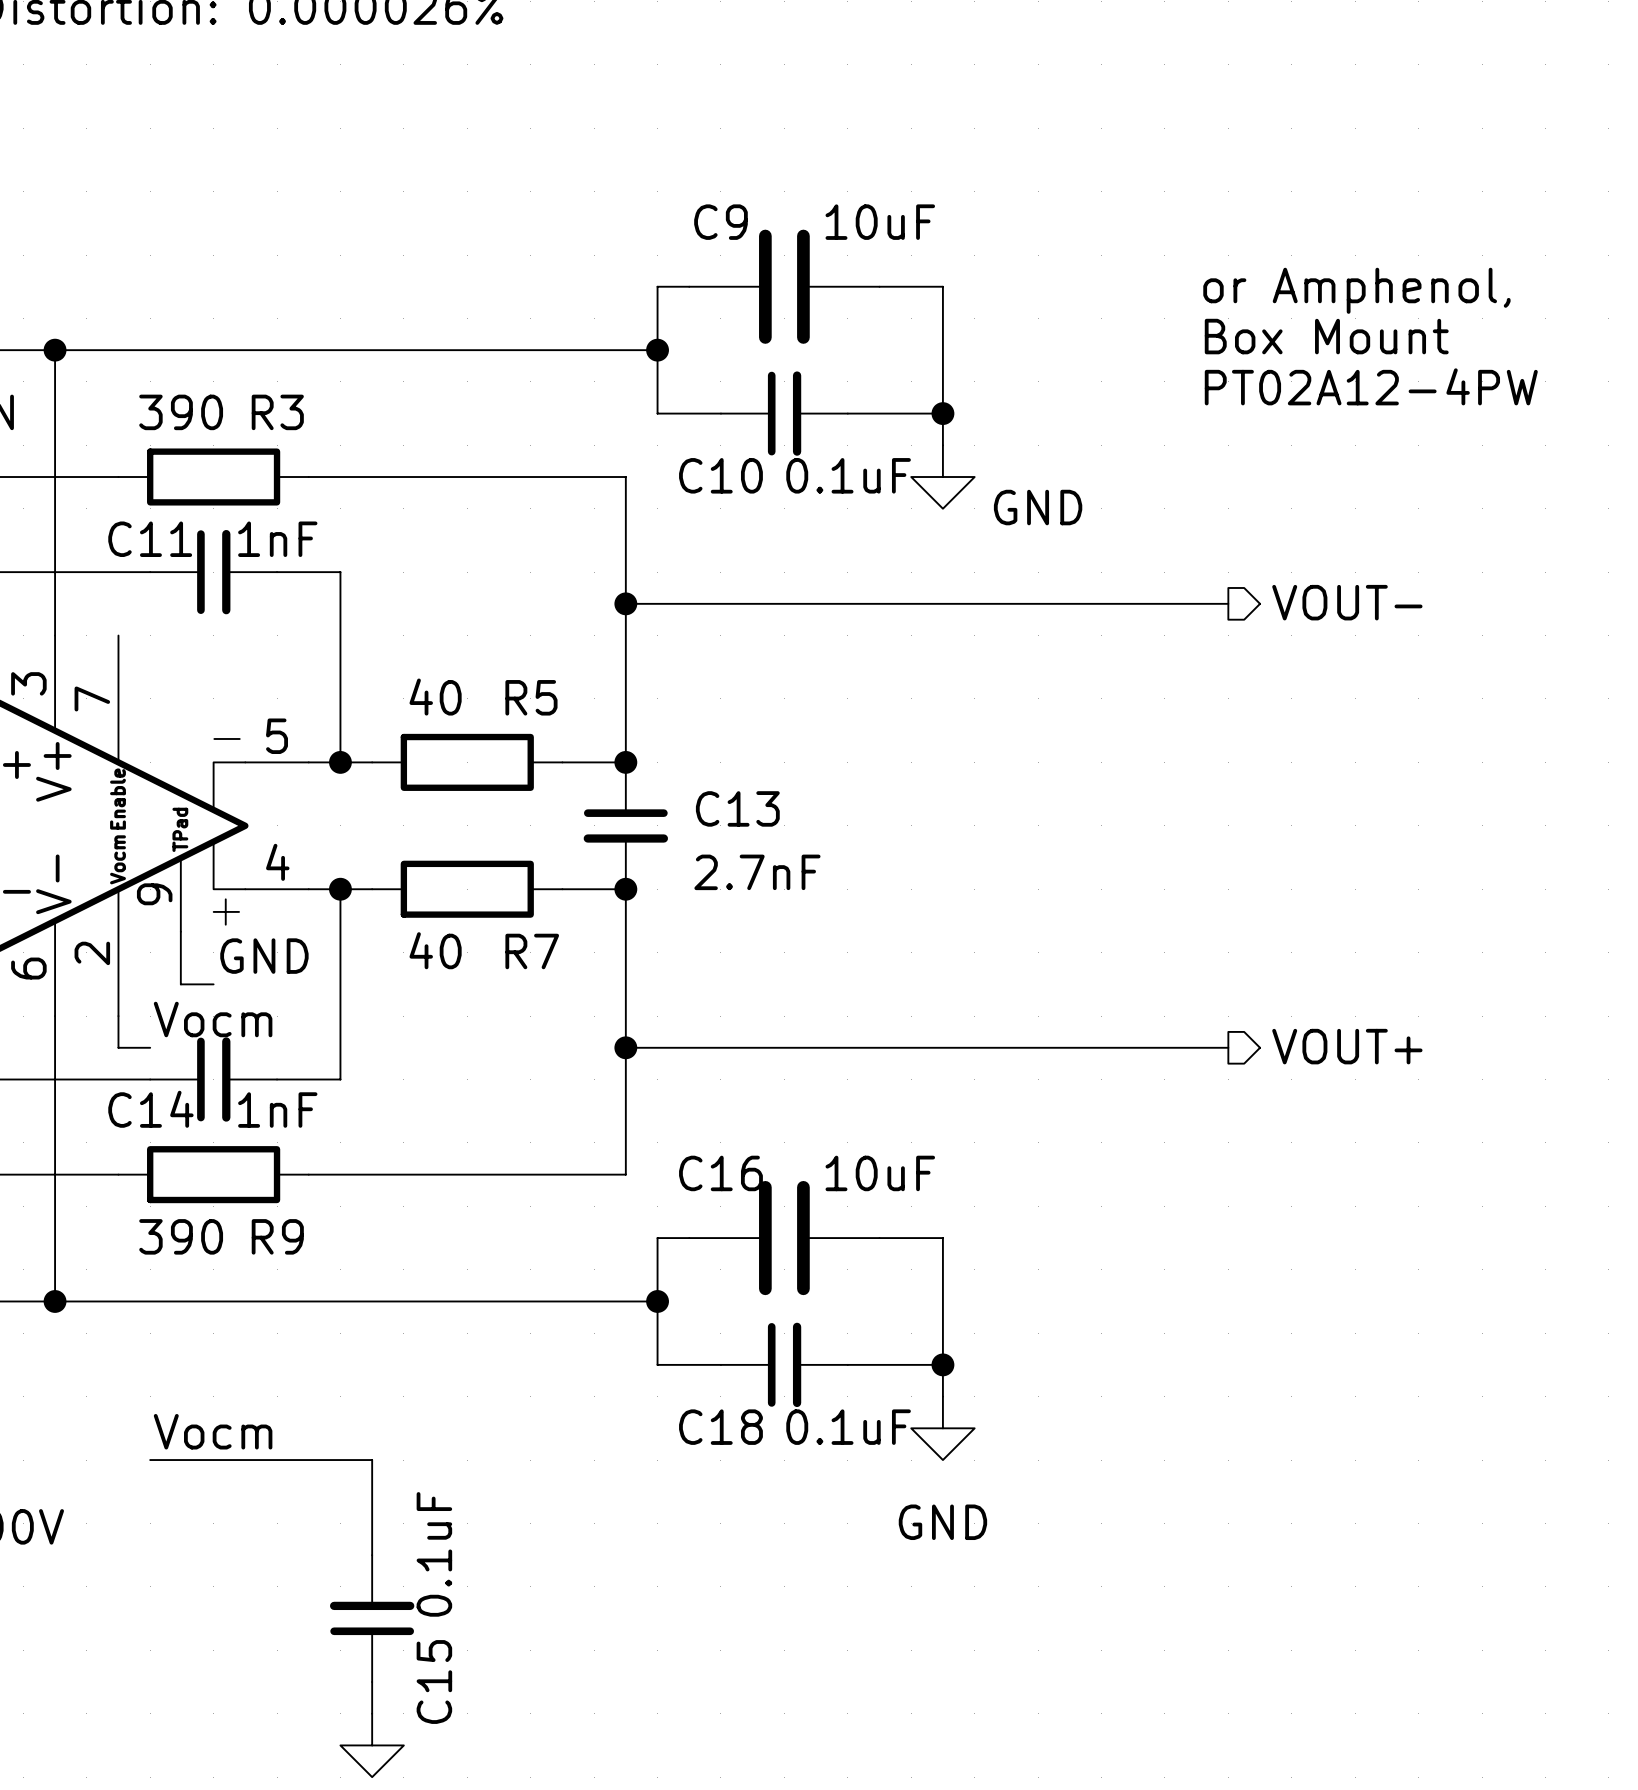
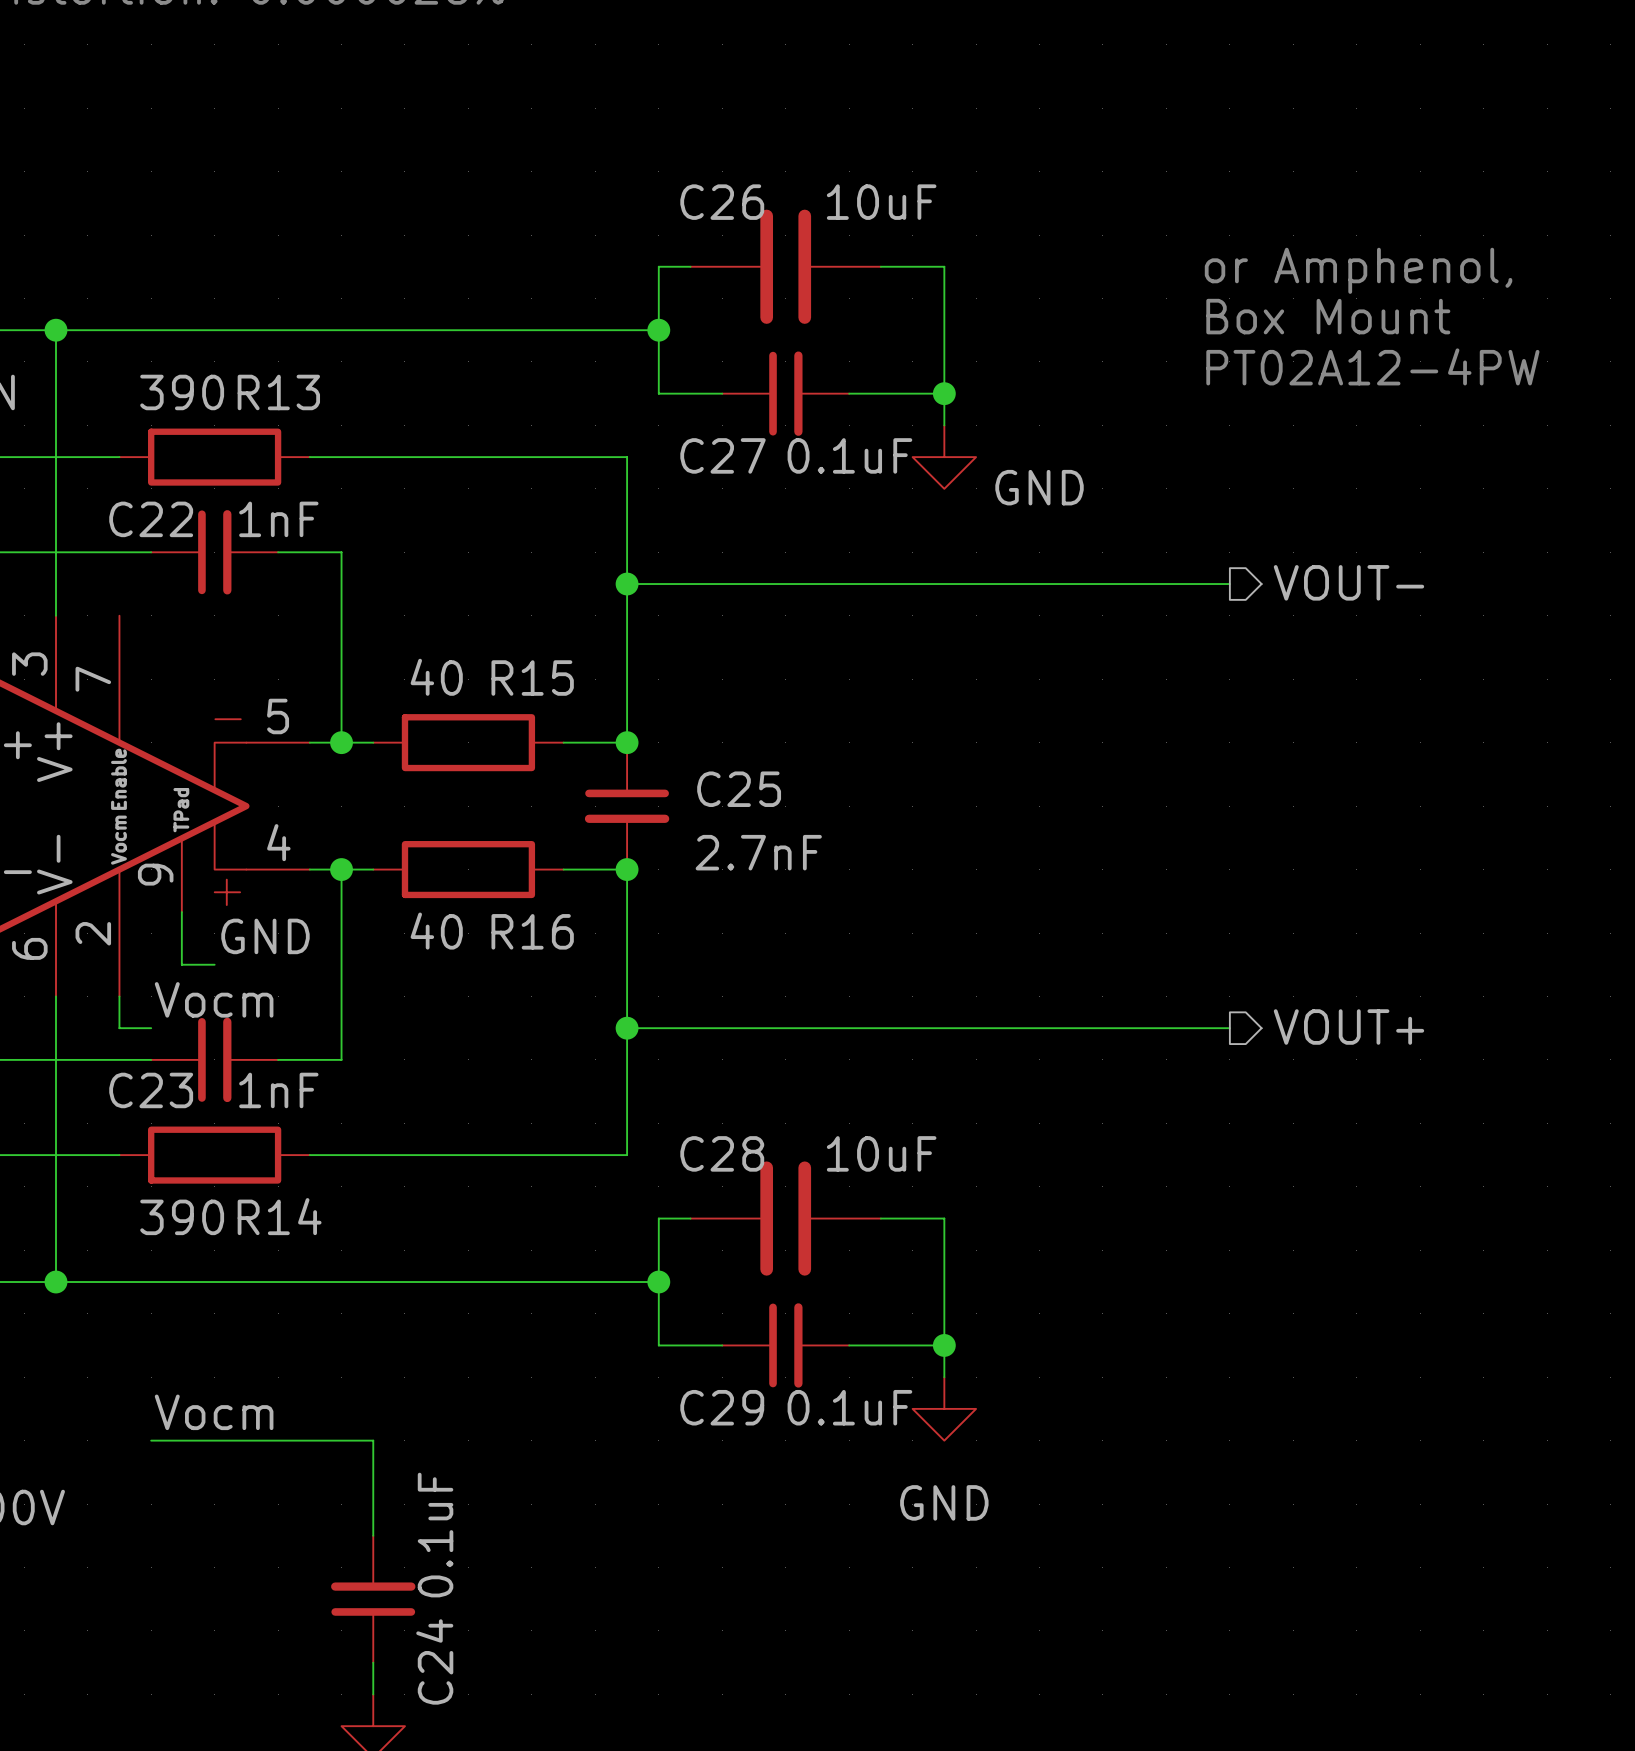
C9 name: C9 (720, 222) -> C26 (722, 202)
R3 name: R3 (277, 412) -> R13 (278, 392)
C10 name: C10 (720, 475) -> C27 (723, 455)
C11 name: C11 (150, 539) -> C22 (151, 519)
R5 name: R5 (531, 697) -> R15 (532, 678)
C13 name: C13 (737, 808) -> C25 (739, 789)
R7 name: R7 (532, 951) -> R16 (532, 931)
C14 name: C14 (150, 1109) -> C23 (151, 1090)
C16 name: C16 (720, 1173) -> C28 (722, 1153)
R9 name: R9 (277, 1236) -> R14 (279, 1216)
C18 name: C18 (720, 1427) -> C29 (722, 1407)
C15 name: C15 (434, 1682) -> C24 (434, 1661)

